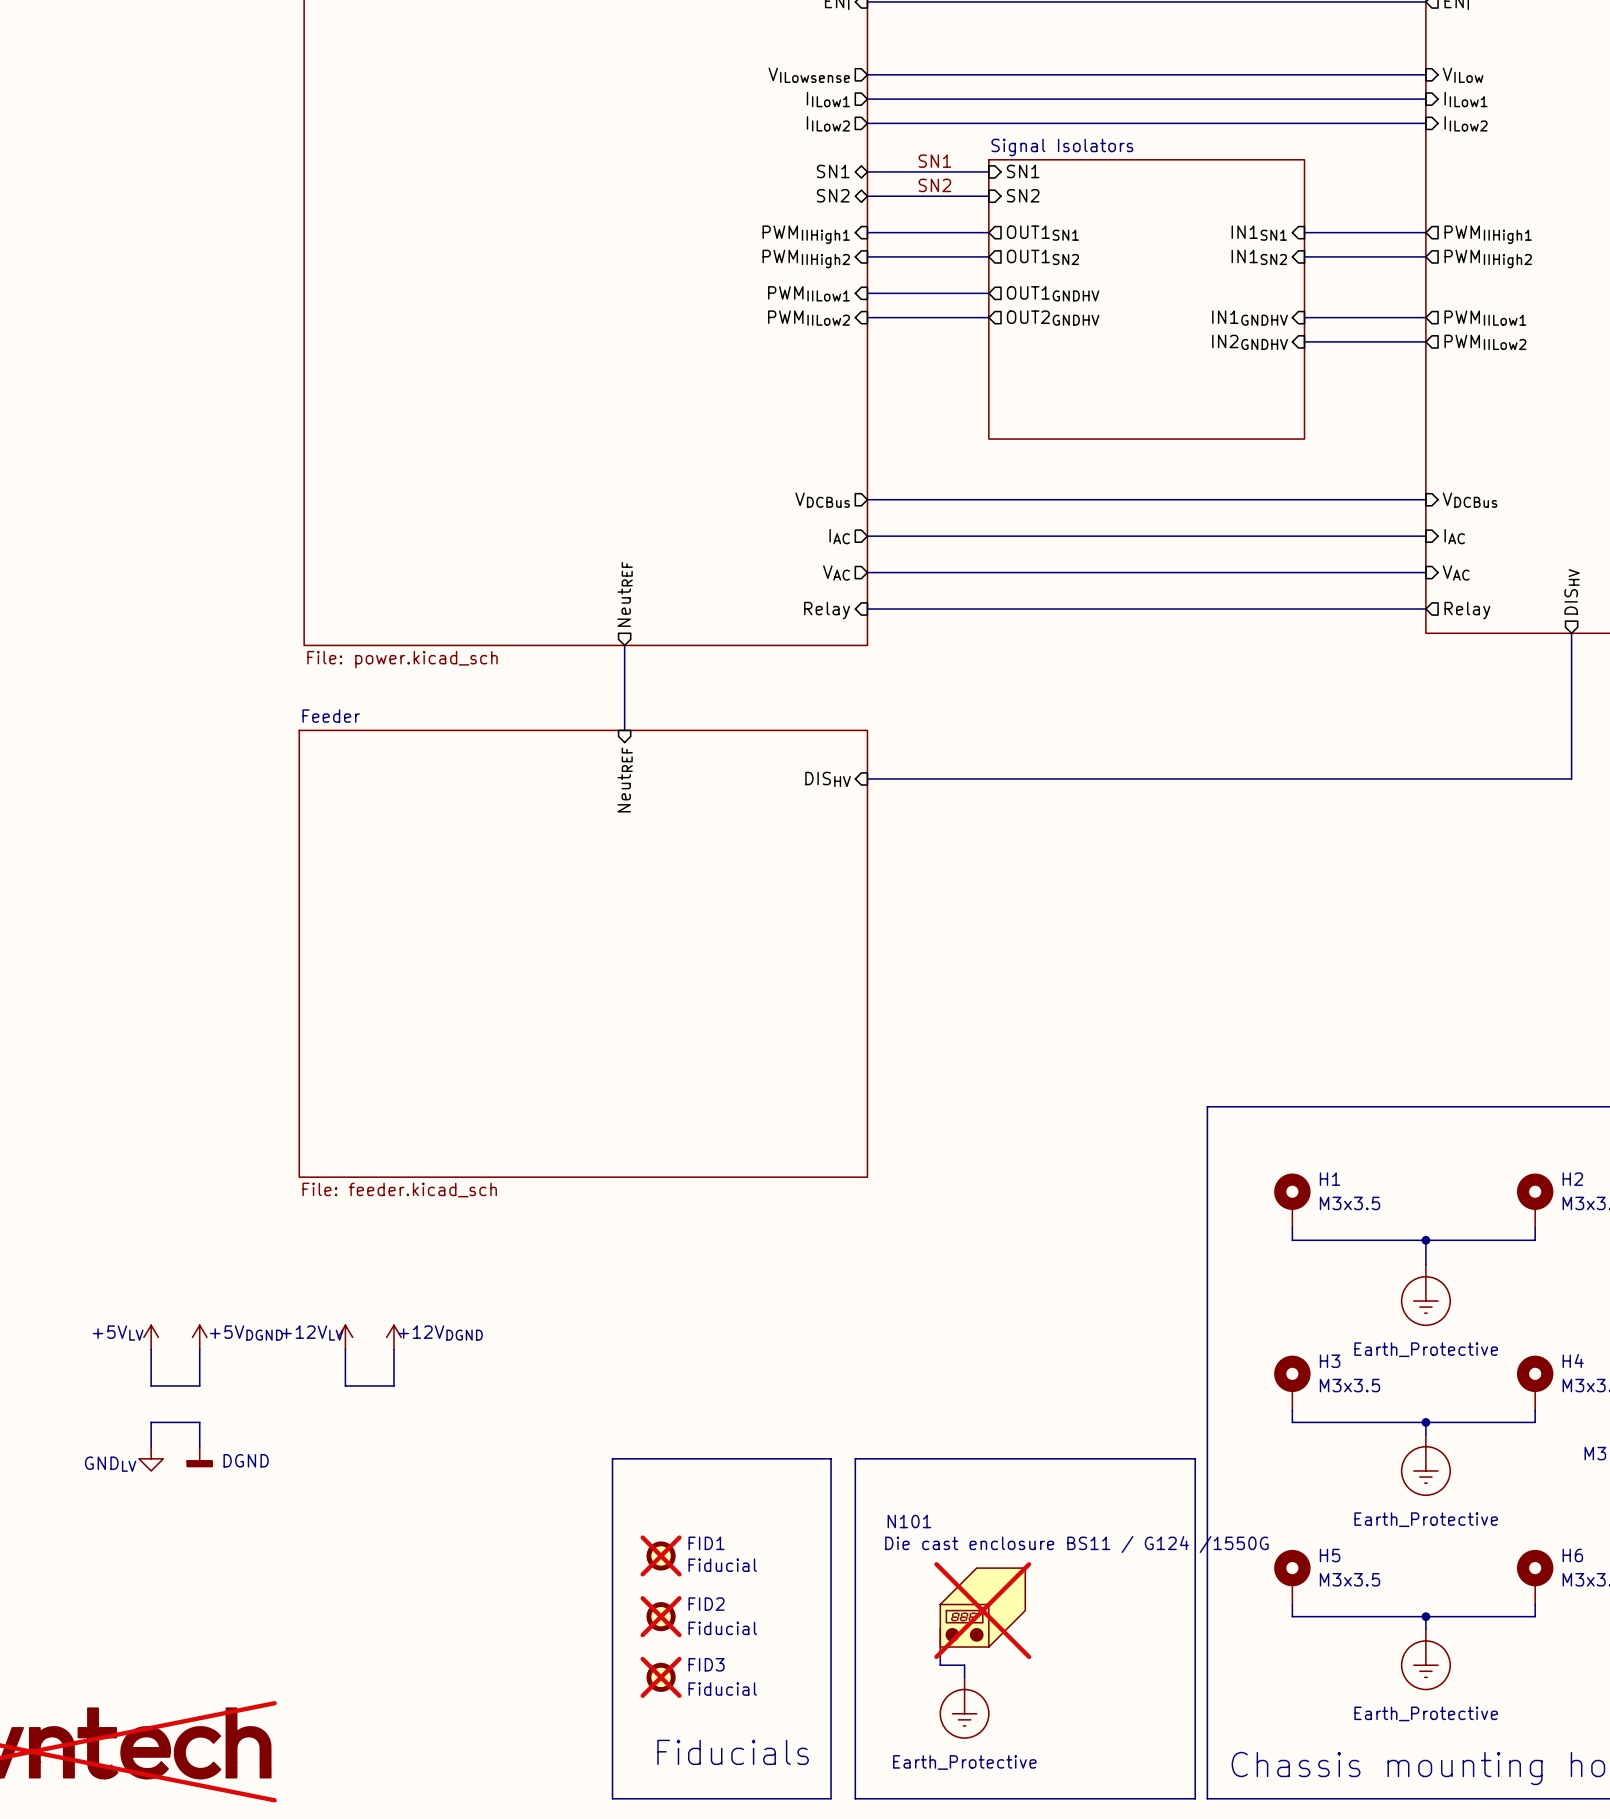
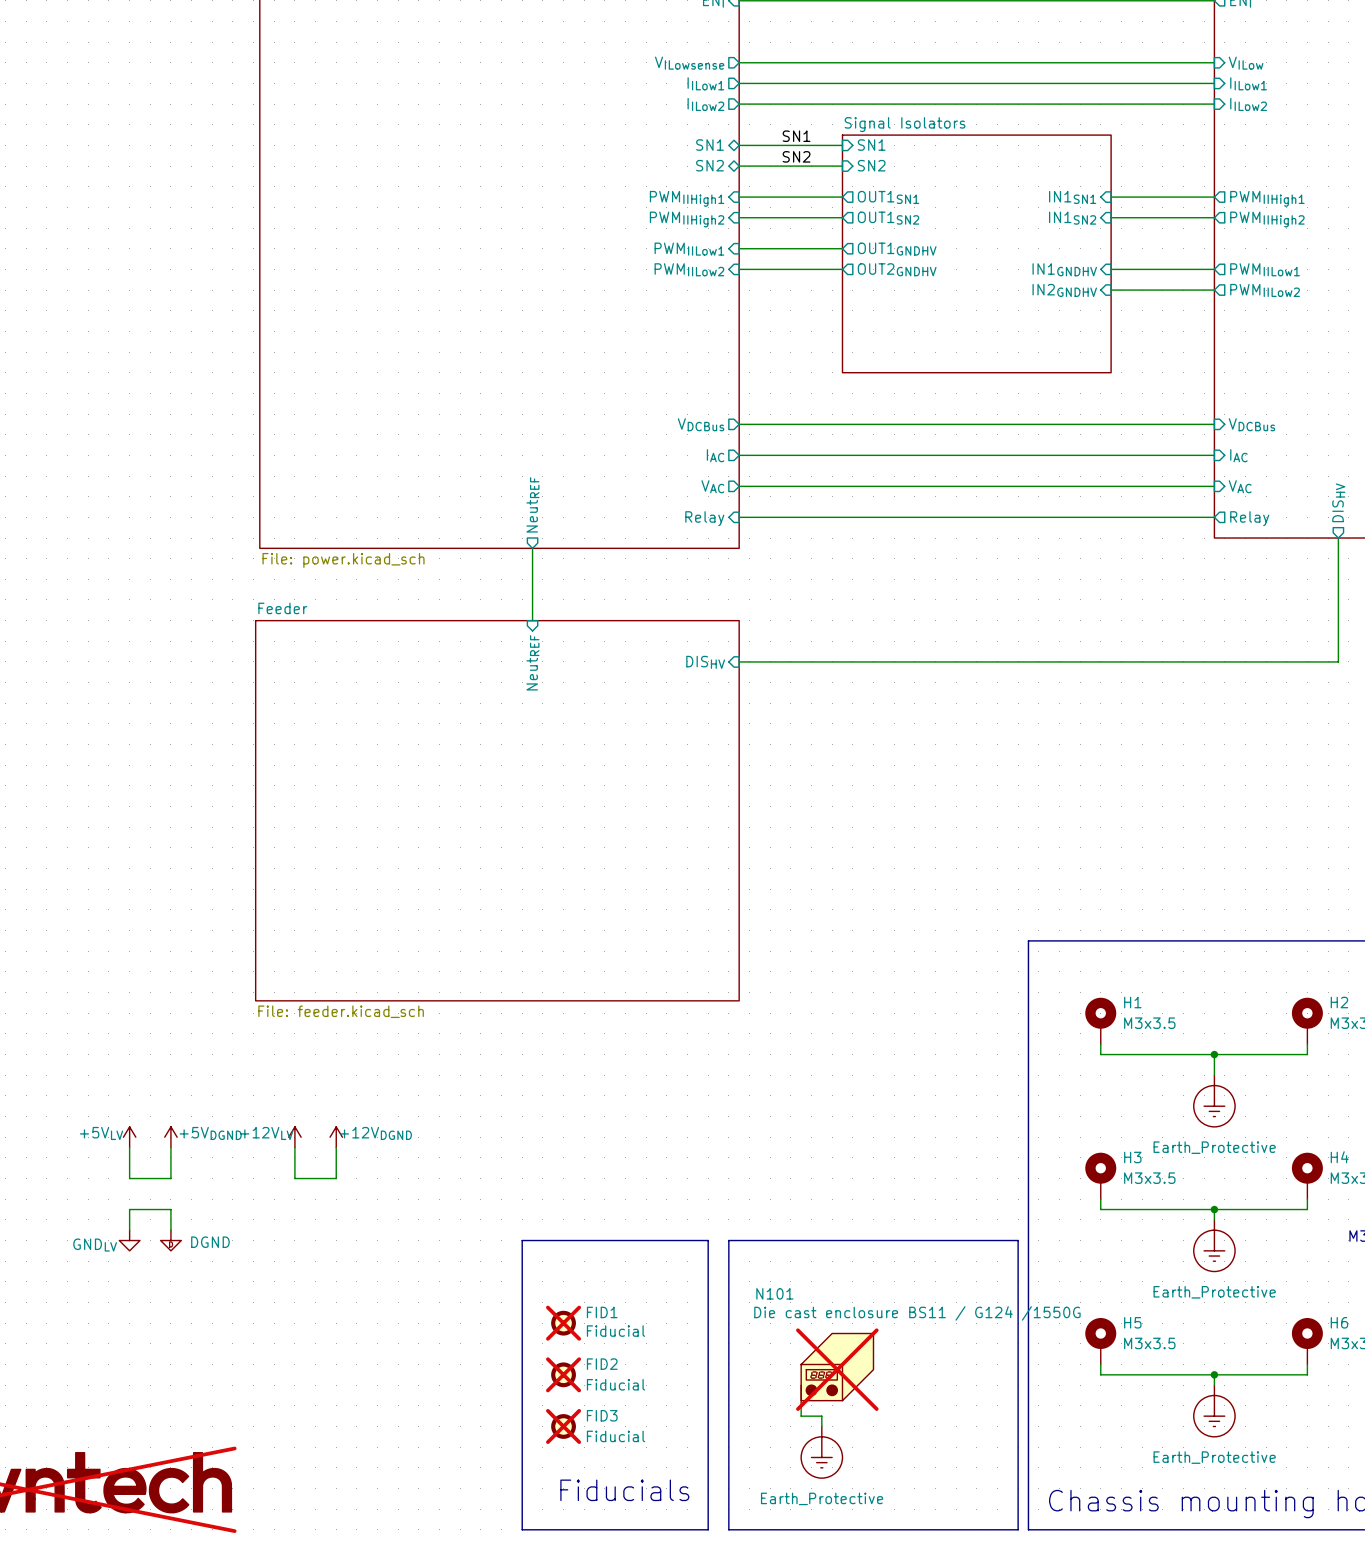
power symbol shape: [186, 1446, 214, 1468] -> [160, 1230, 182, 1251]

